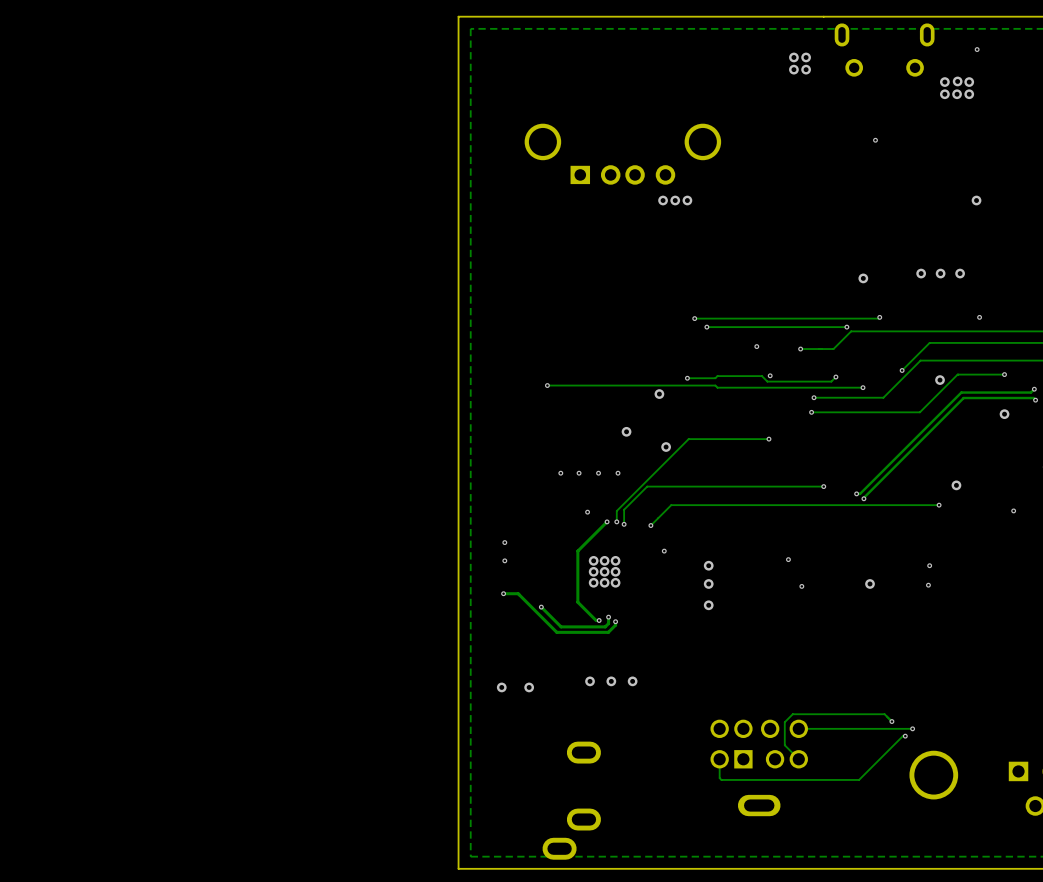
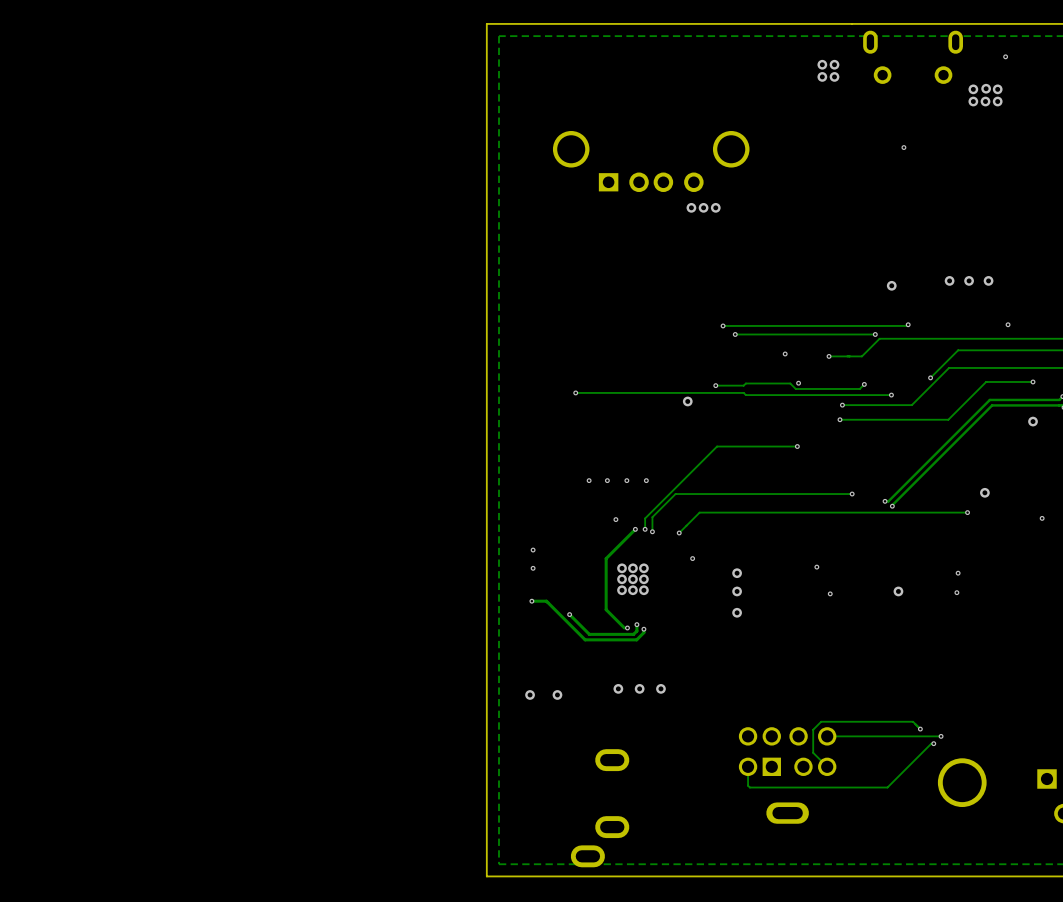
via: (976, 200) -> none
via: (940, 380) -> none
via: (626, 431) -> none
via: (666, 447) -> none

